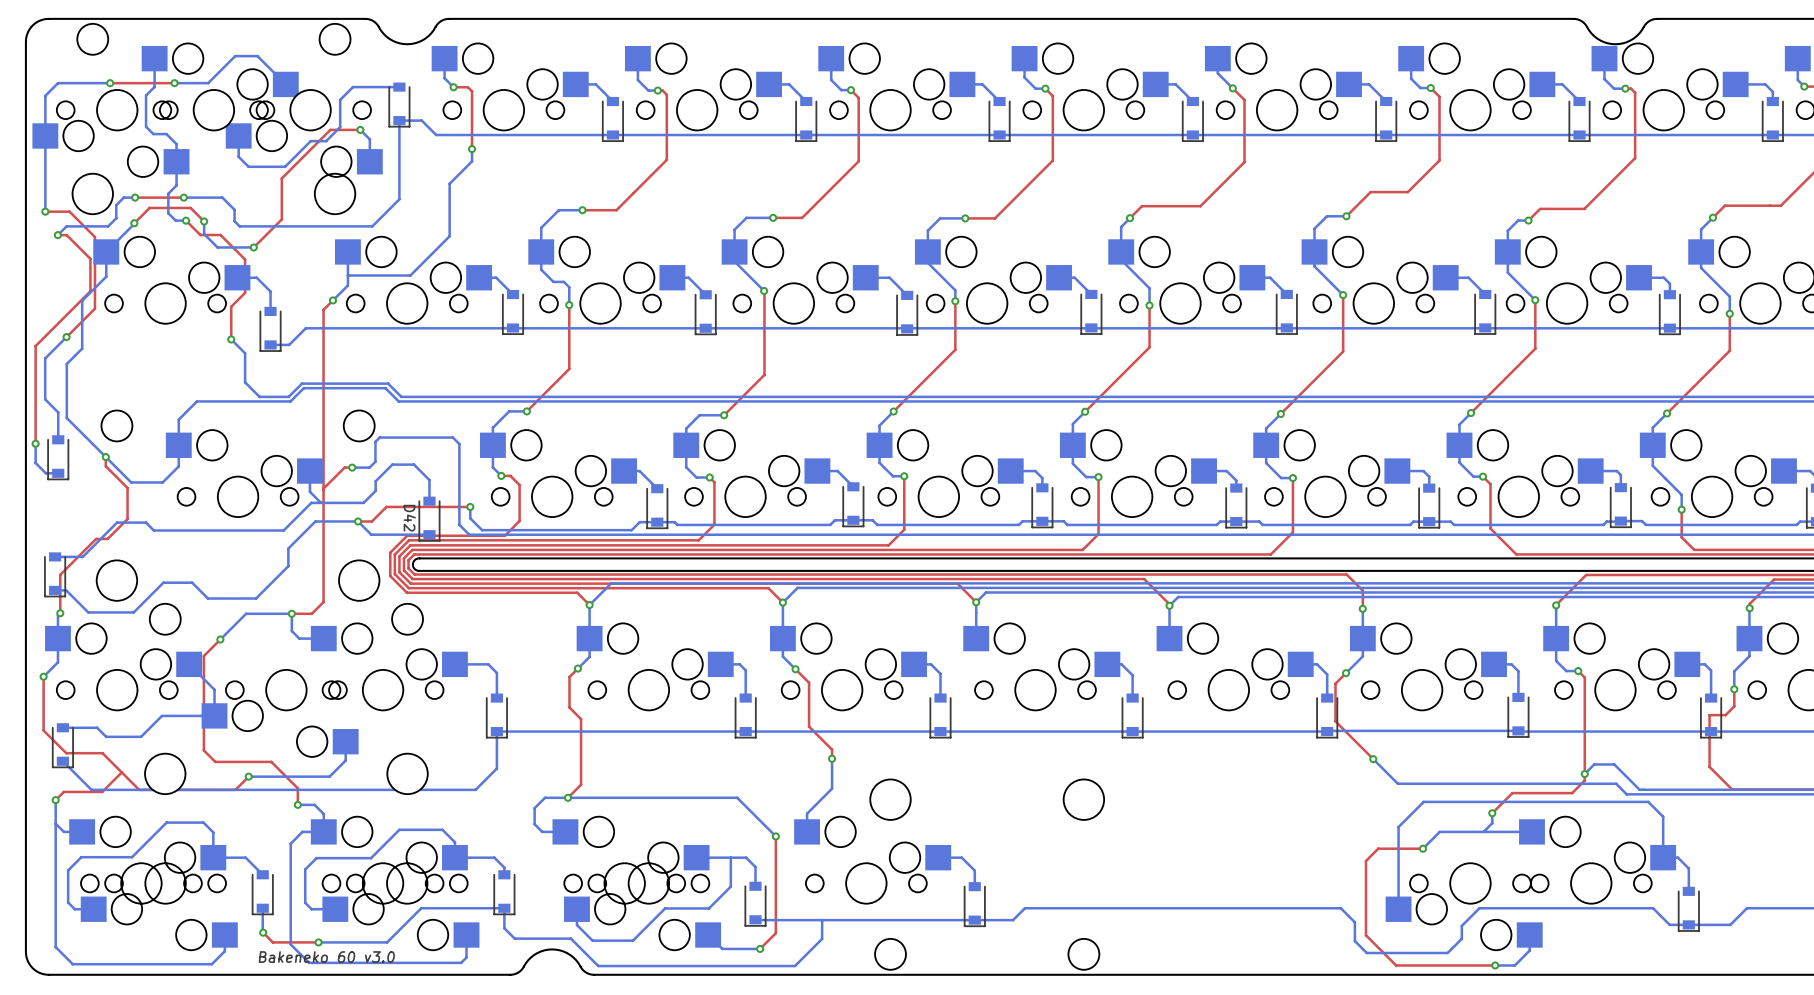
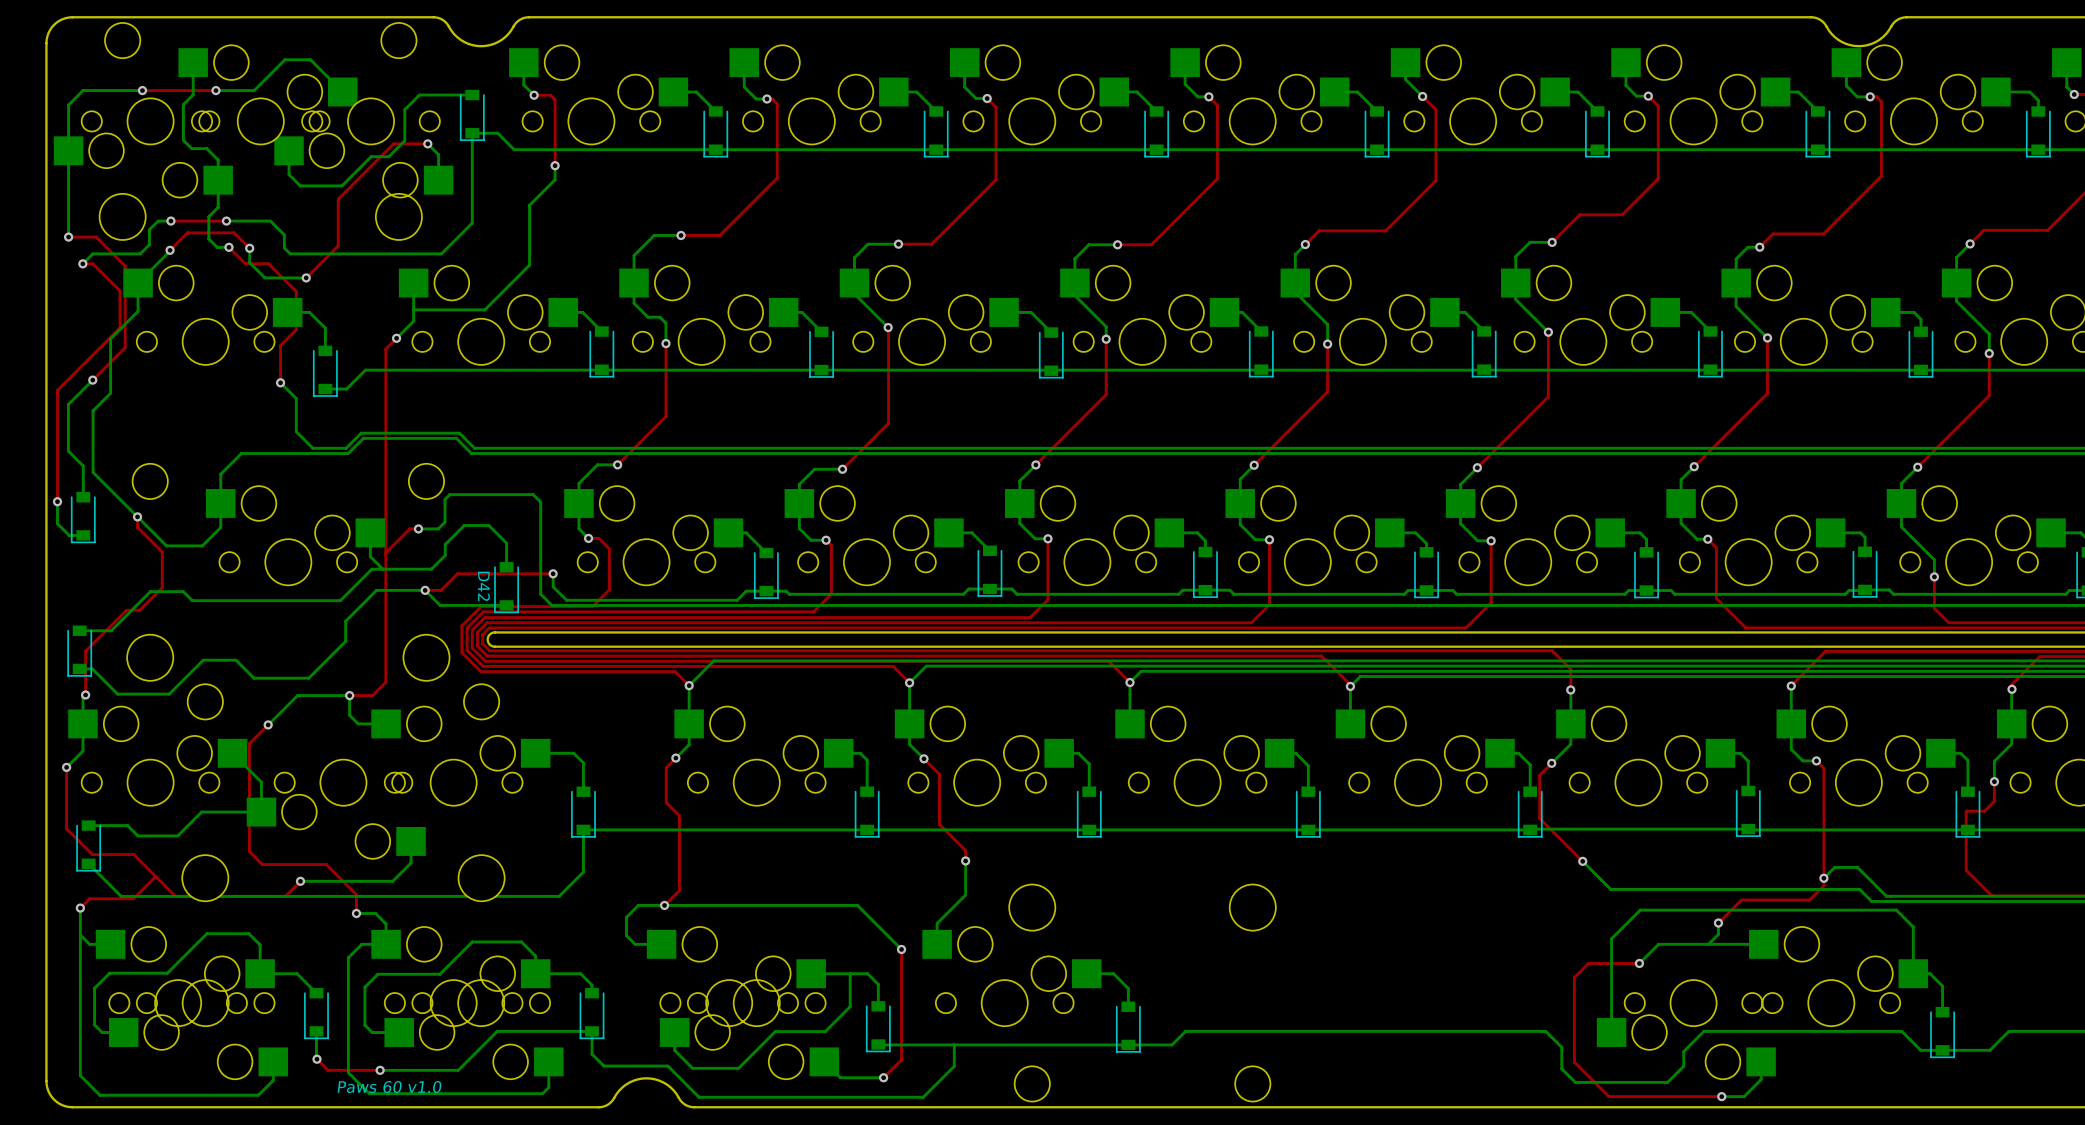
text: Bakeneko 60 v3.0 (326, 957) -> Paws 60 v1.0 (389, 1087)

